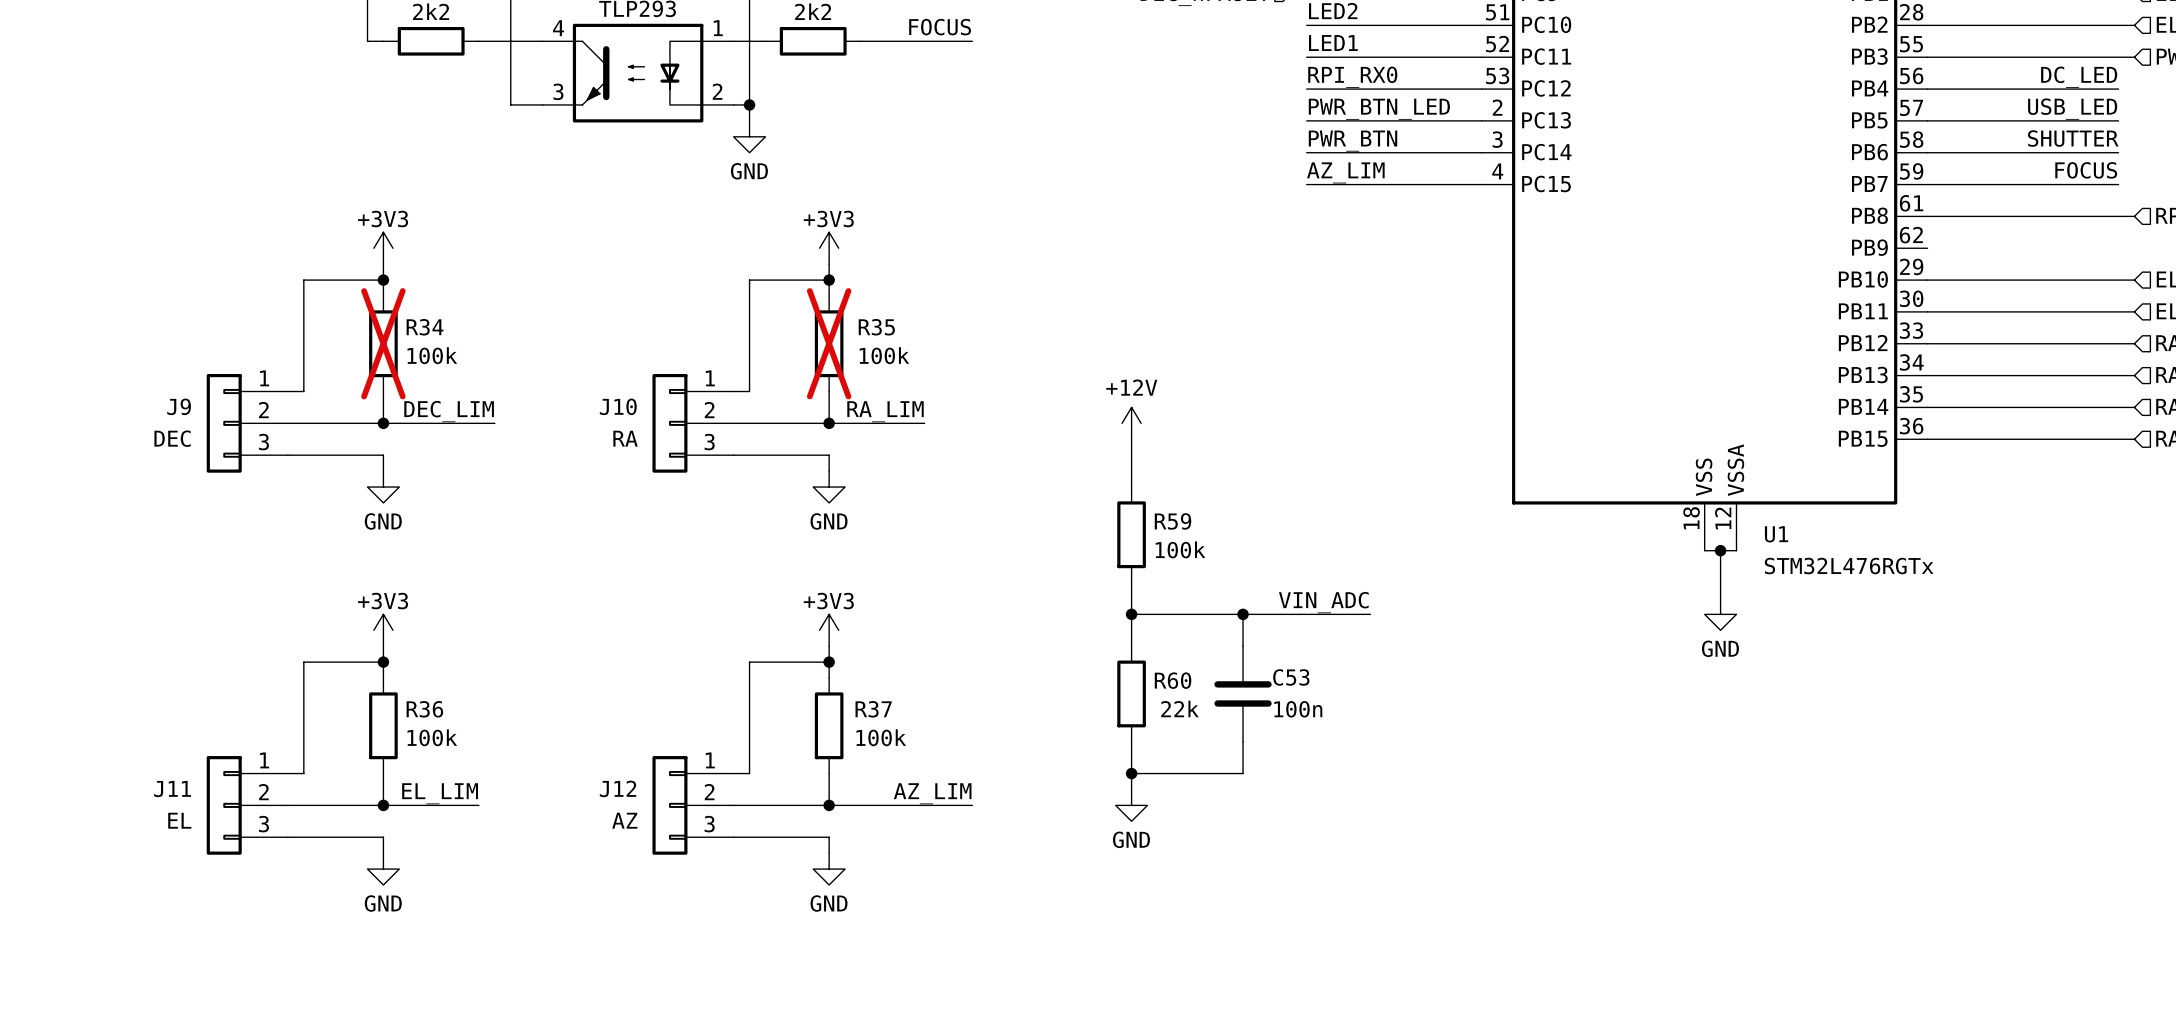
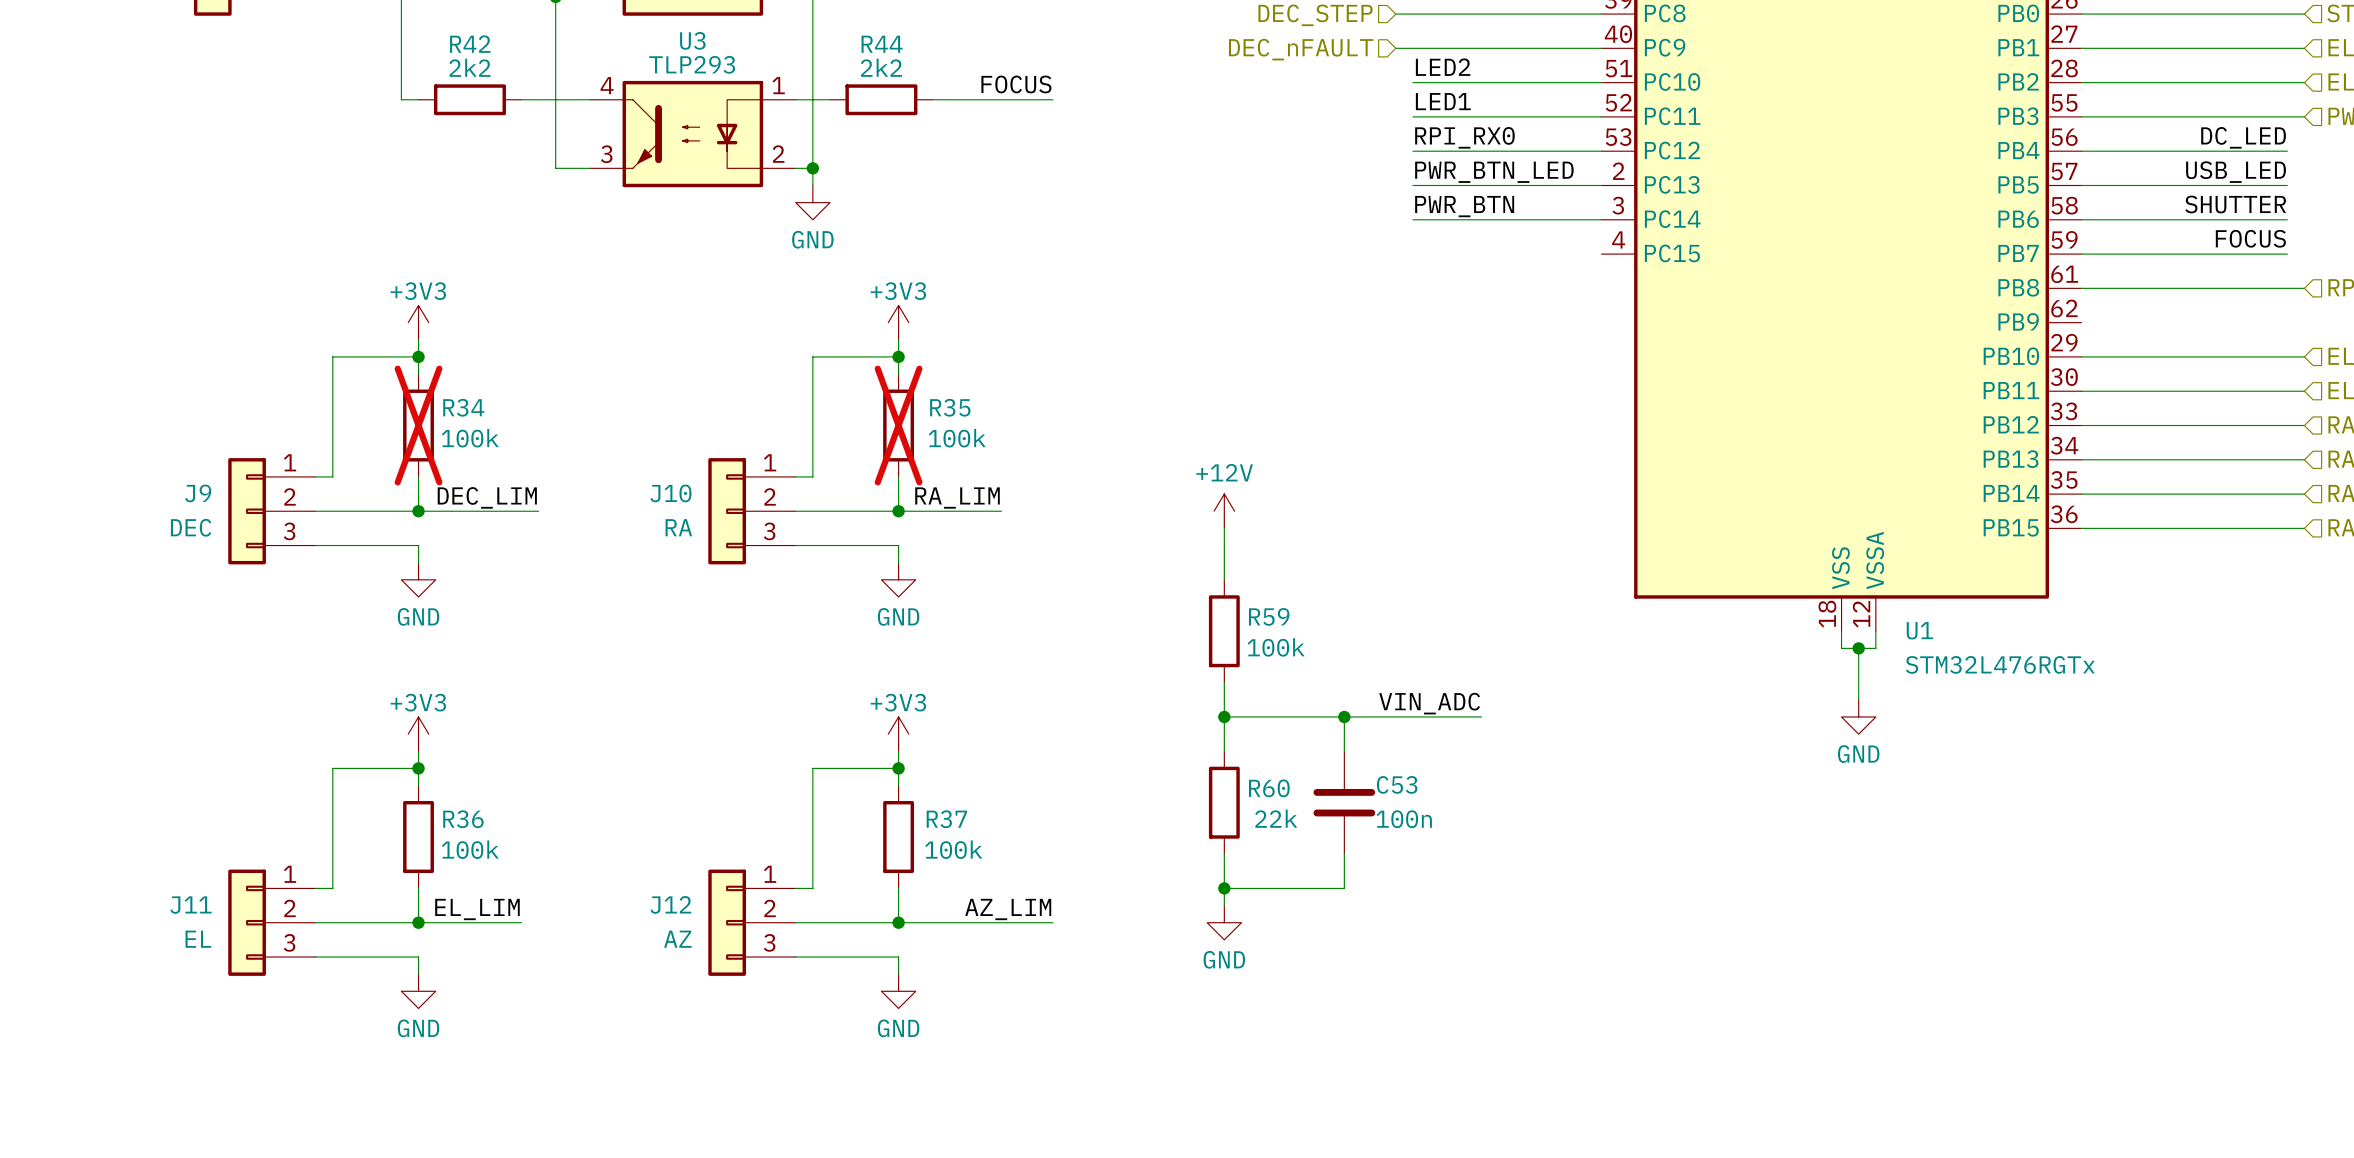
label: AZ_LIM (1345, 172) -> none
wire: (1306, 184) (1481, 184) -> none

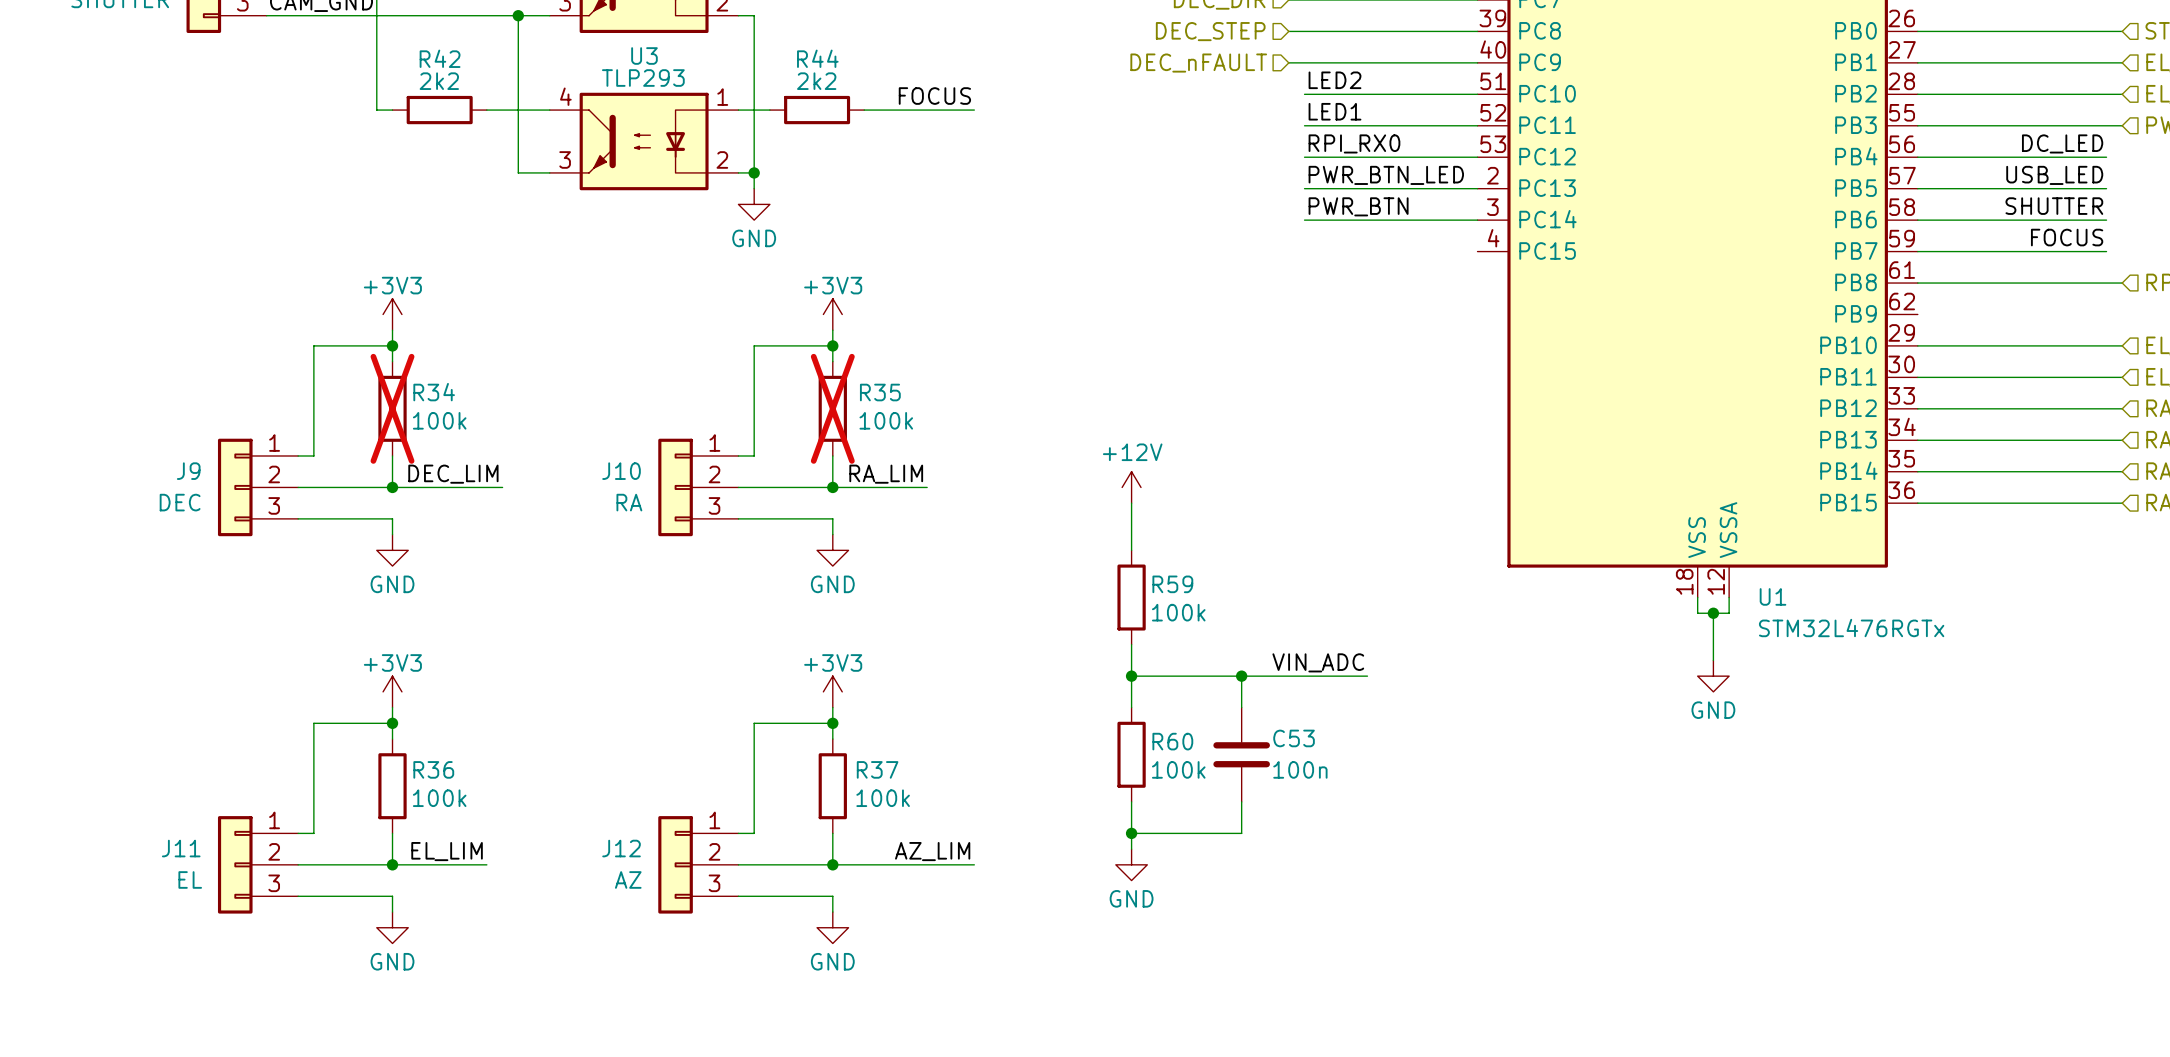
R60 value: 22k (1276, 818) -> 100k (1178, 769)

